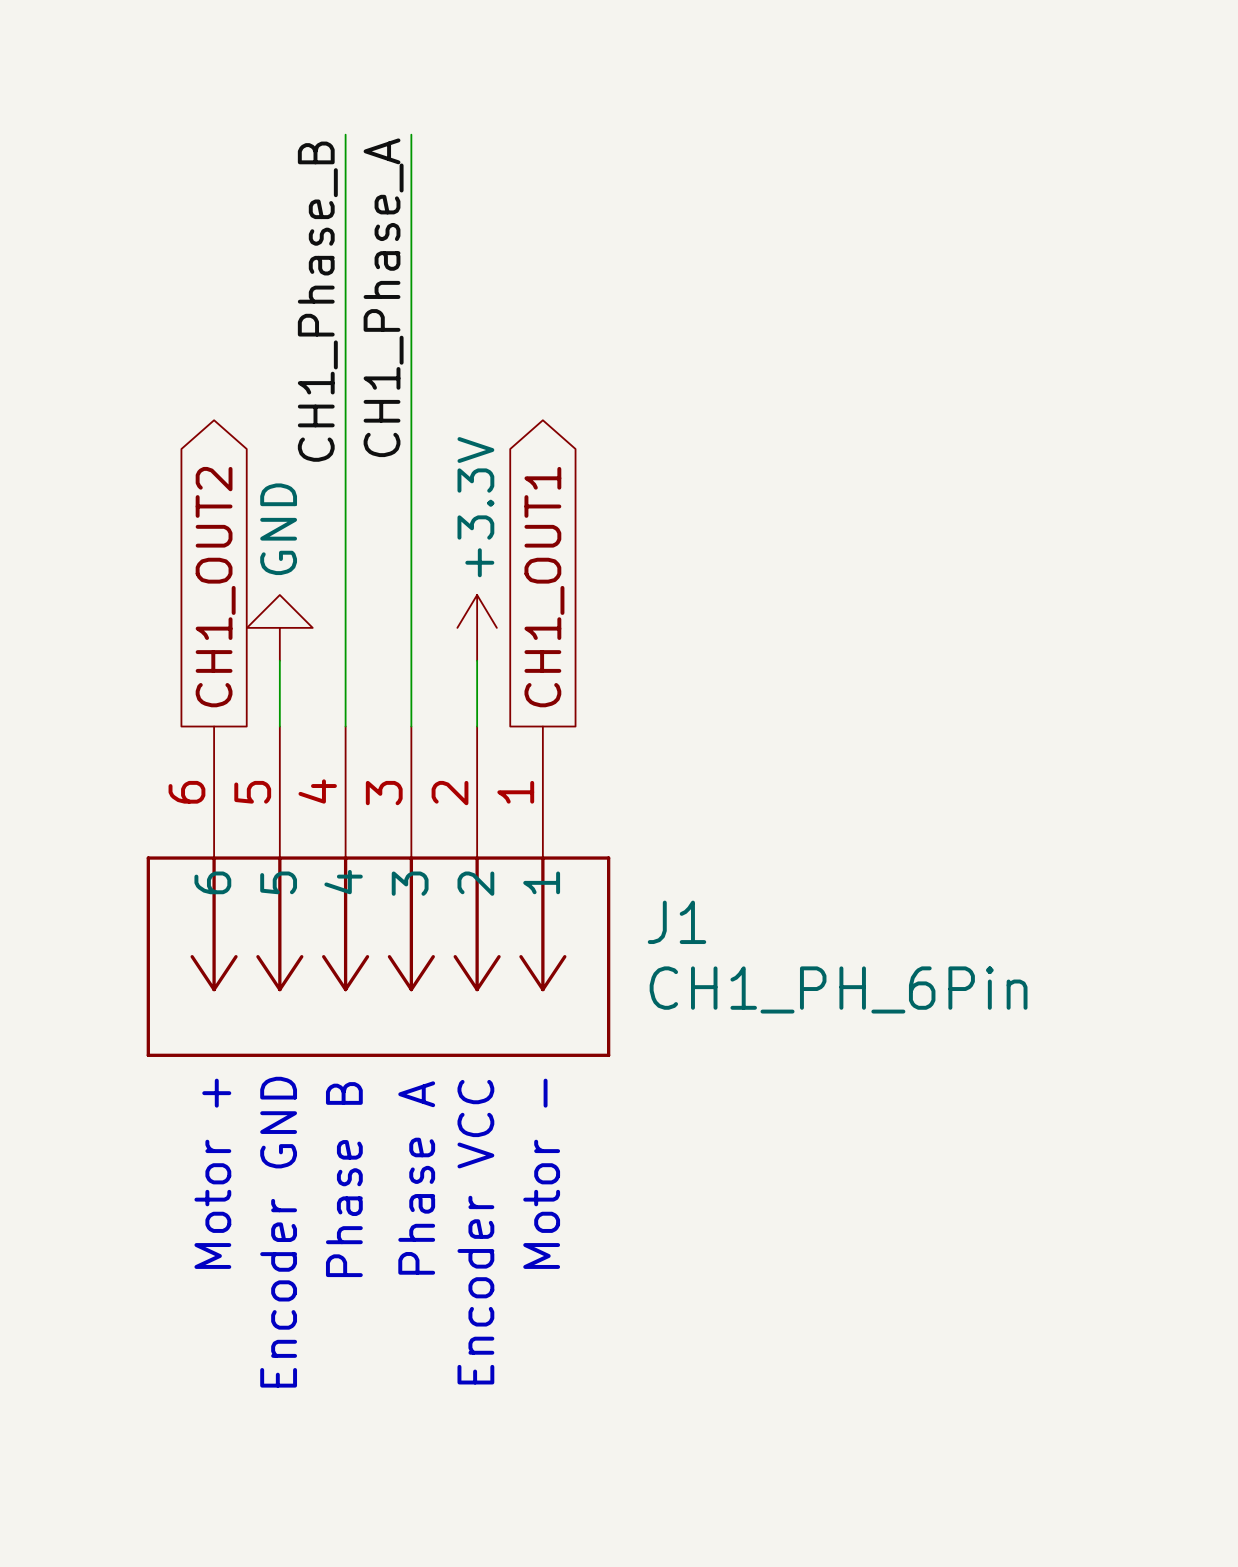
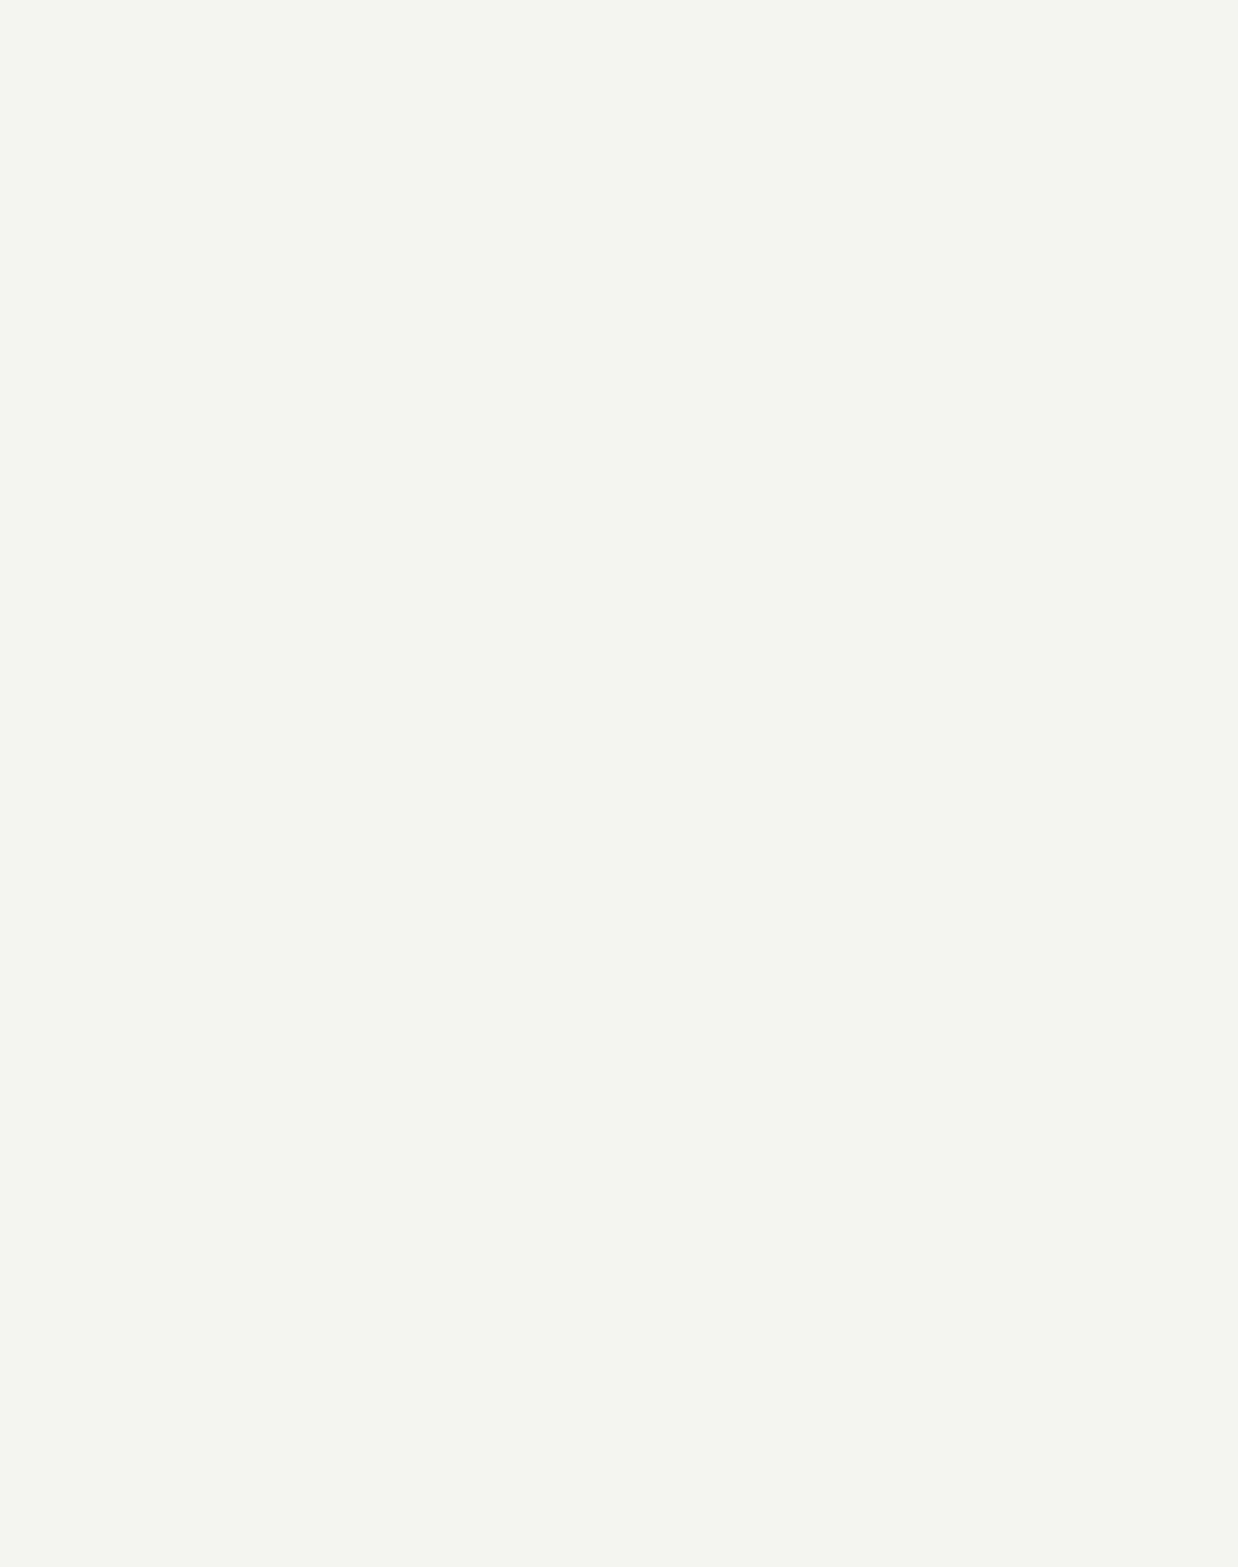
wire: (345, 134) (345, 726) -> none
wire: (411, 134) (411, 726) -> none
label: CH1_Phase_A (383, 297) -> none
label: CH1_Phase_B (317, 301) -> none
global label: CH1_OUT2 (215, 587) -> none
global label: CH1_OUT1 (544, 587) -> none
power symbol: GND (279, 627) -> none
power symbol: +3.3V (477, 627) -> none
wire: (279, 660) (279, 726) -> none
wire: (477, 660) (477, 726) -> none
J1: CH1_PH_6Pin (378, 891) -> none
text: Motor + (212, 1173) -> none
text: Motor - (541, 1173) -> none
text: Phase A (416, 1178) -> none
text: Phase B (344, 1179) -> none
text: Encoder GND (278, 1232) -> none
text: Encoder VCC (475, 1232) -> none

